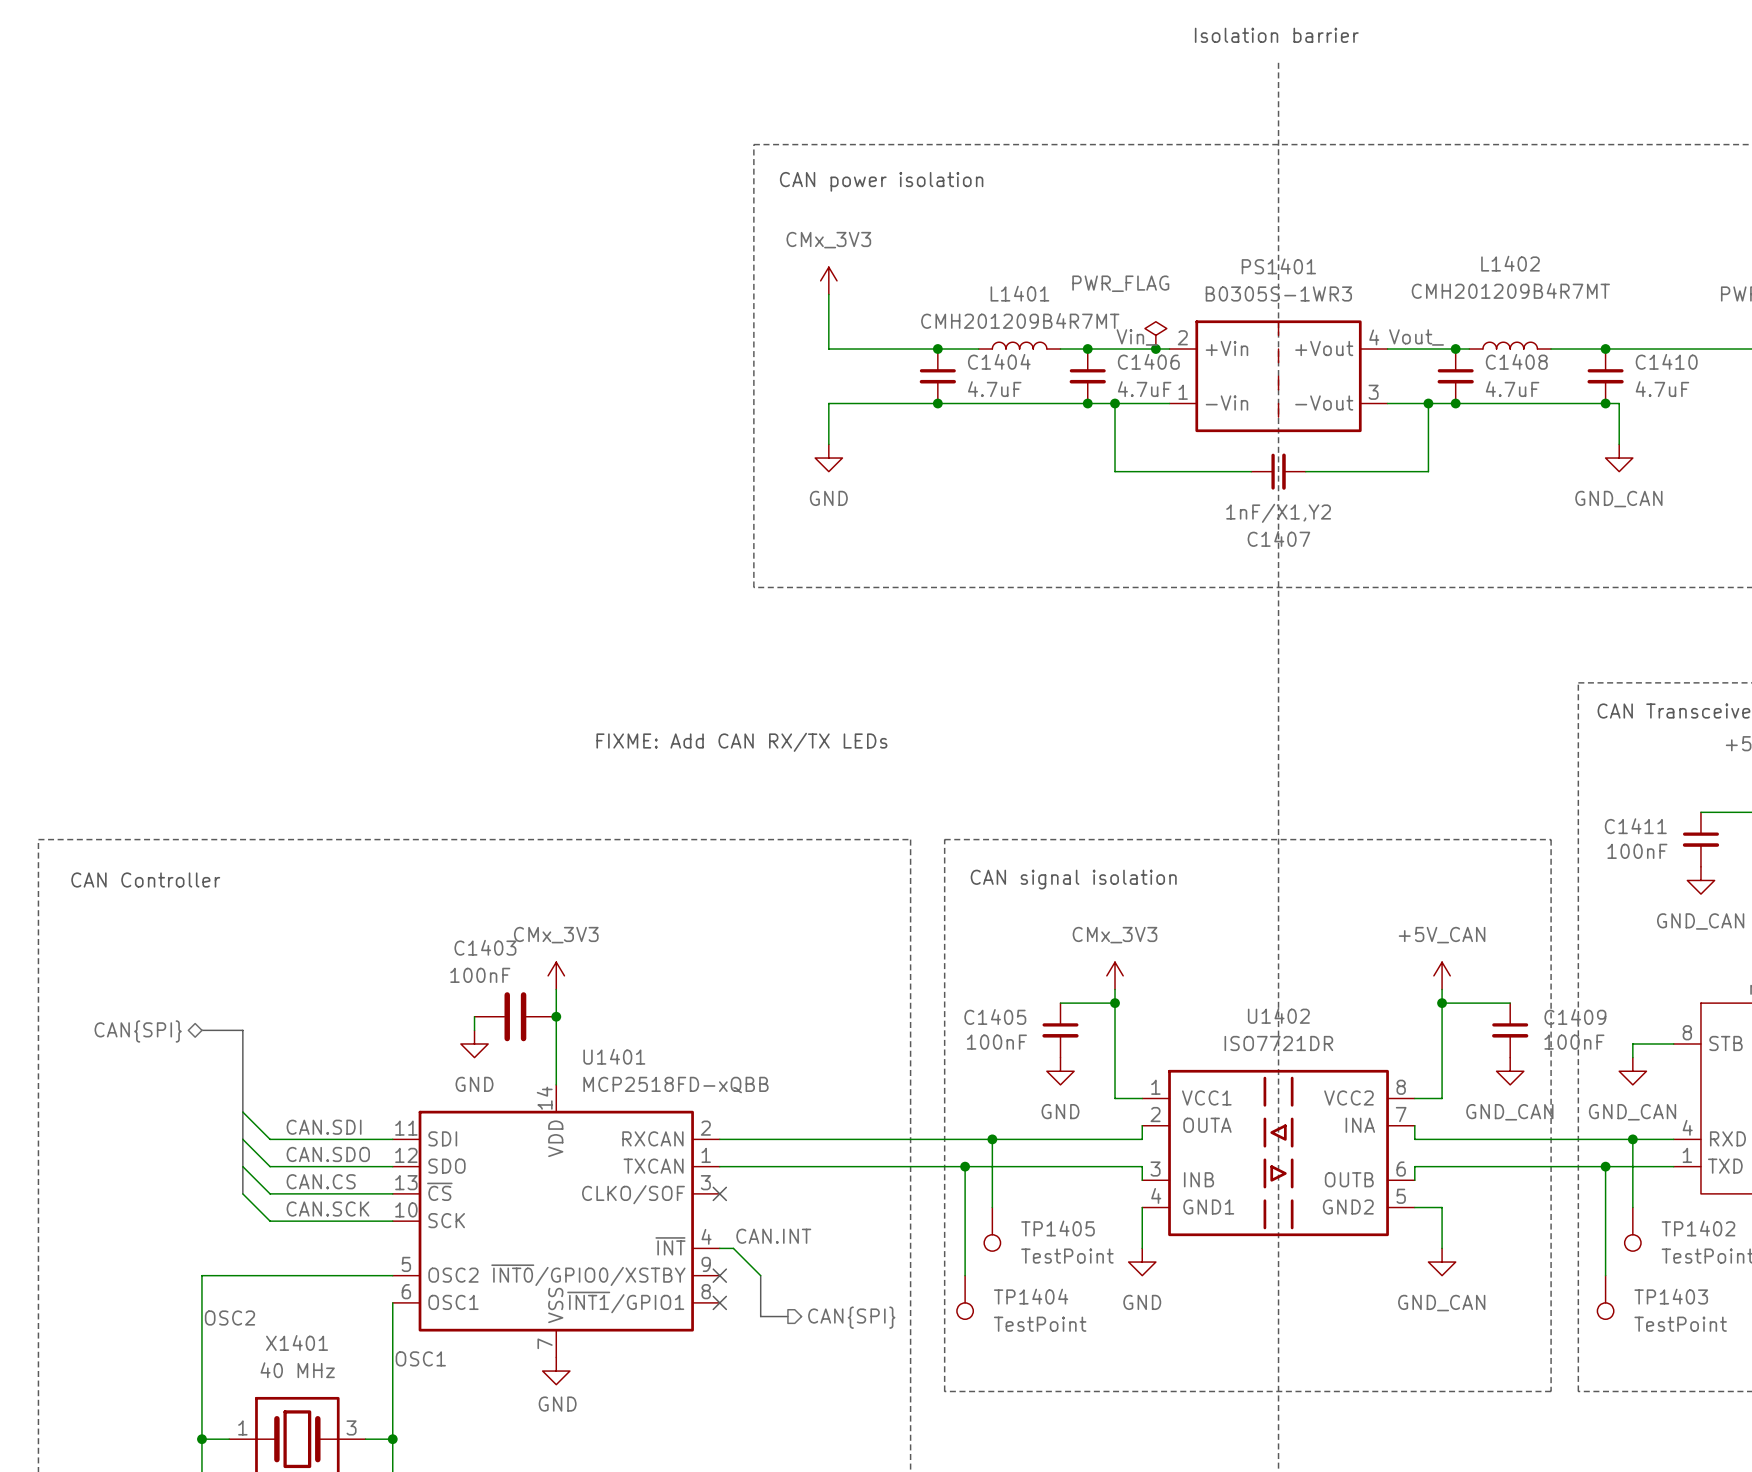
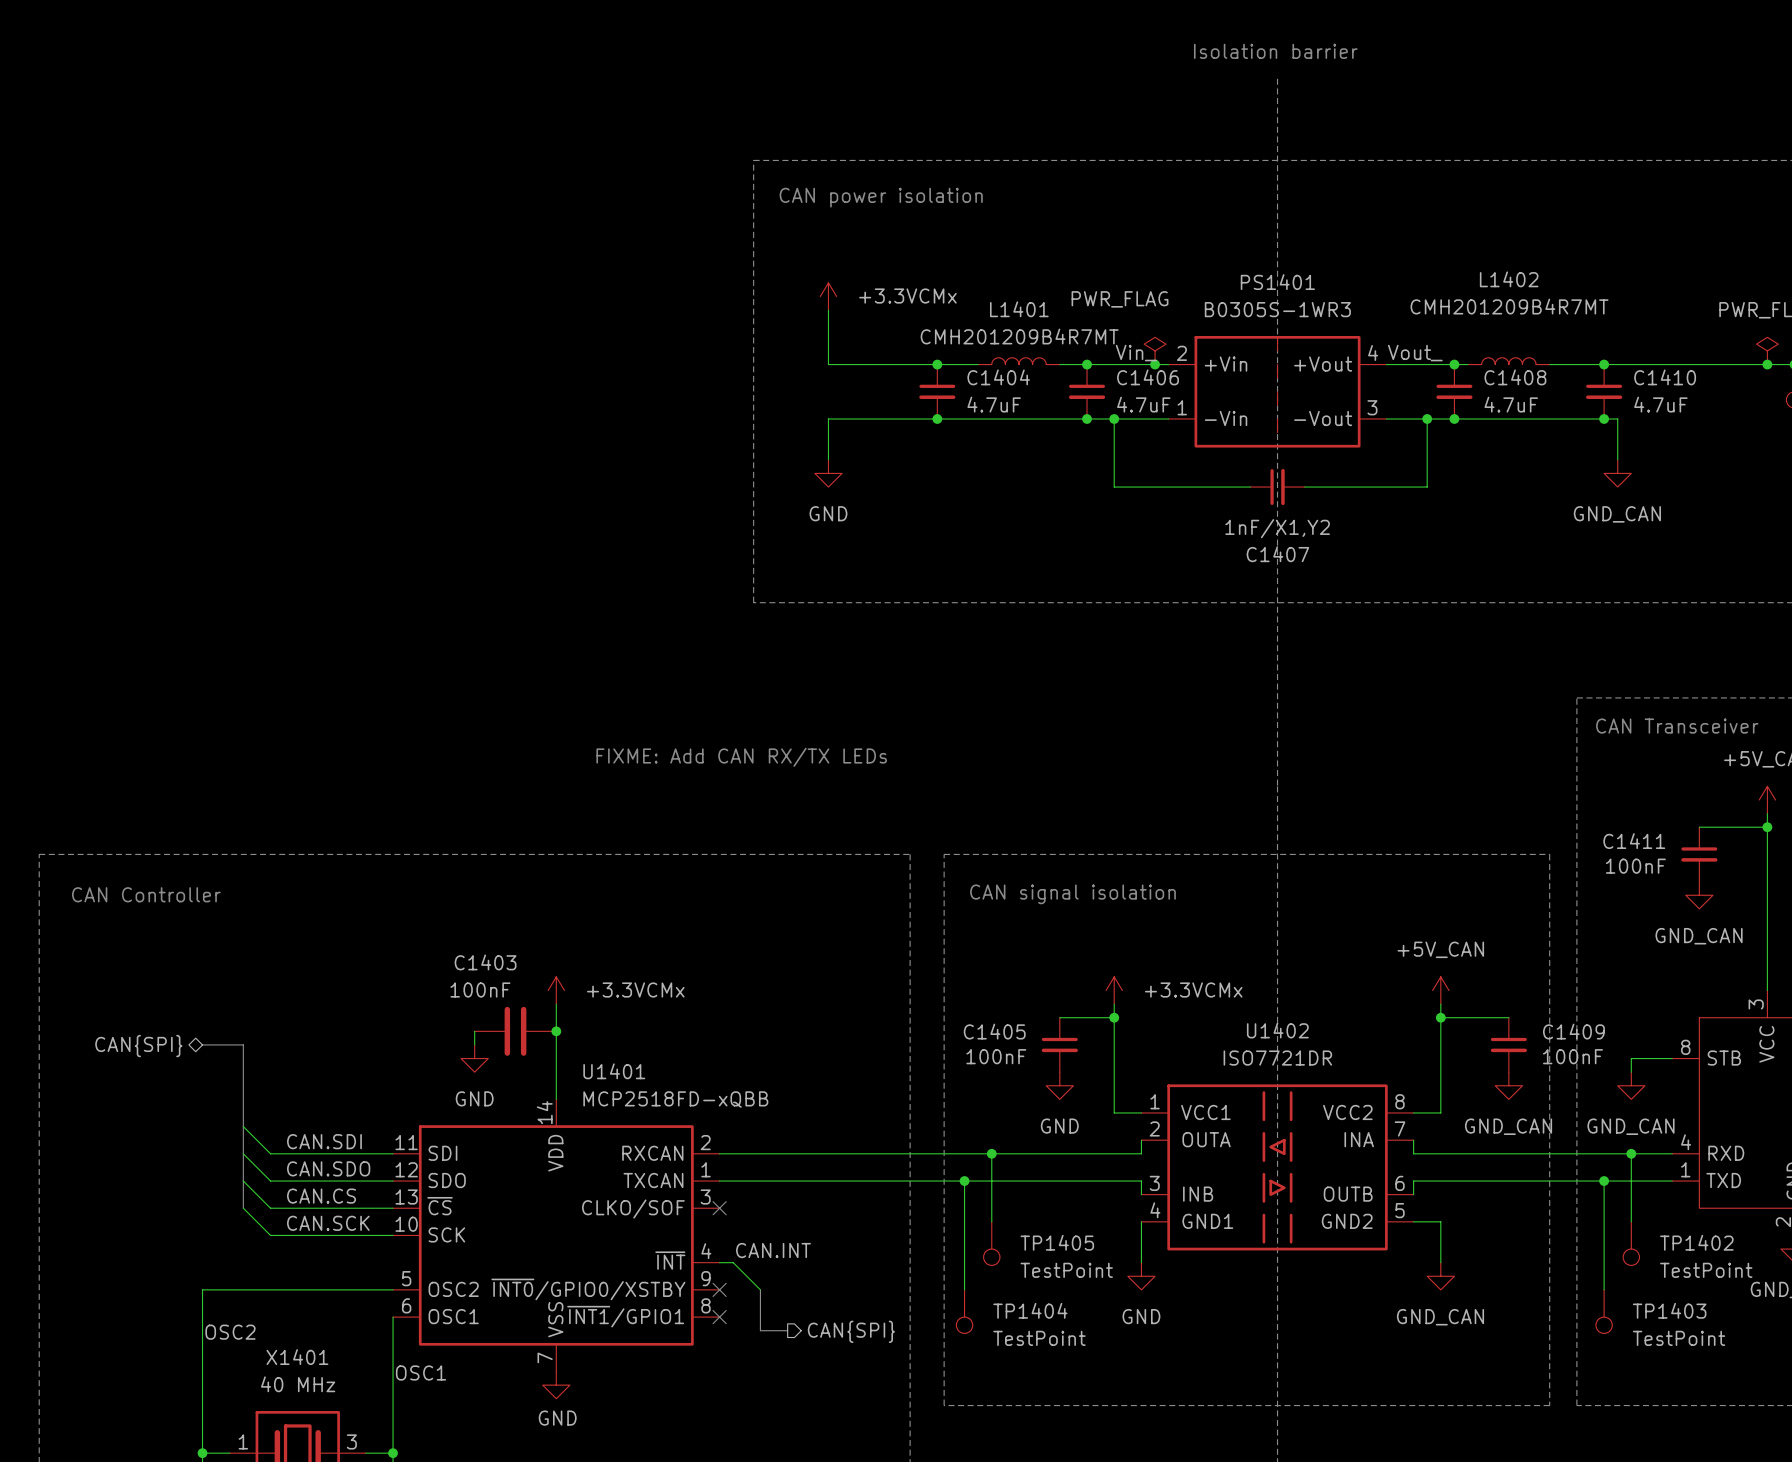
power symbol: CMx_3V3 (828, 280) -> +3.3VCMx (828, 296)
power symbol: CMx_3V3 (556, 975) -> +3.3VCMx (556, 990)
power symbol: CMx_3V3 (1115, 975) -> +3.3VCMx (1114, 990)

